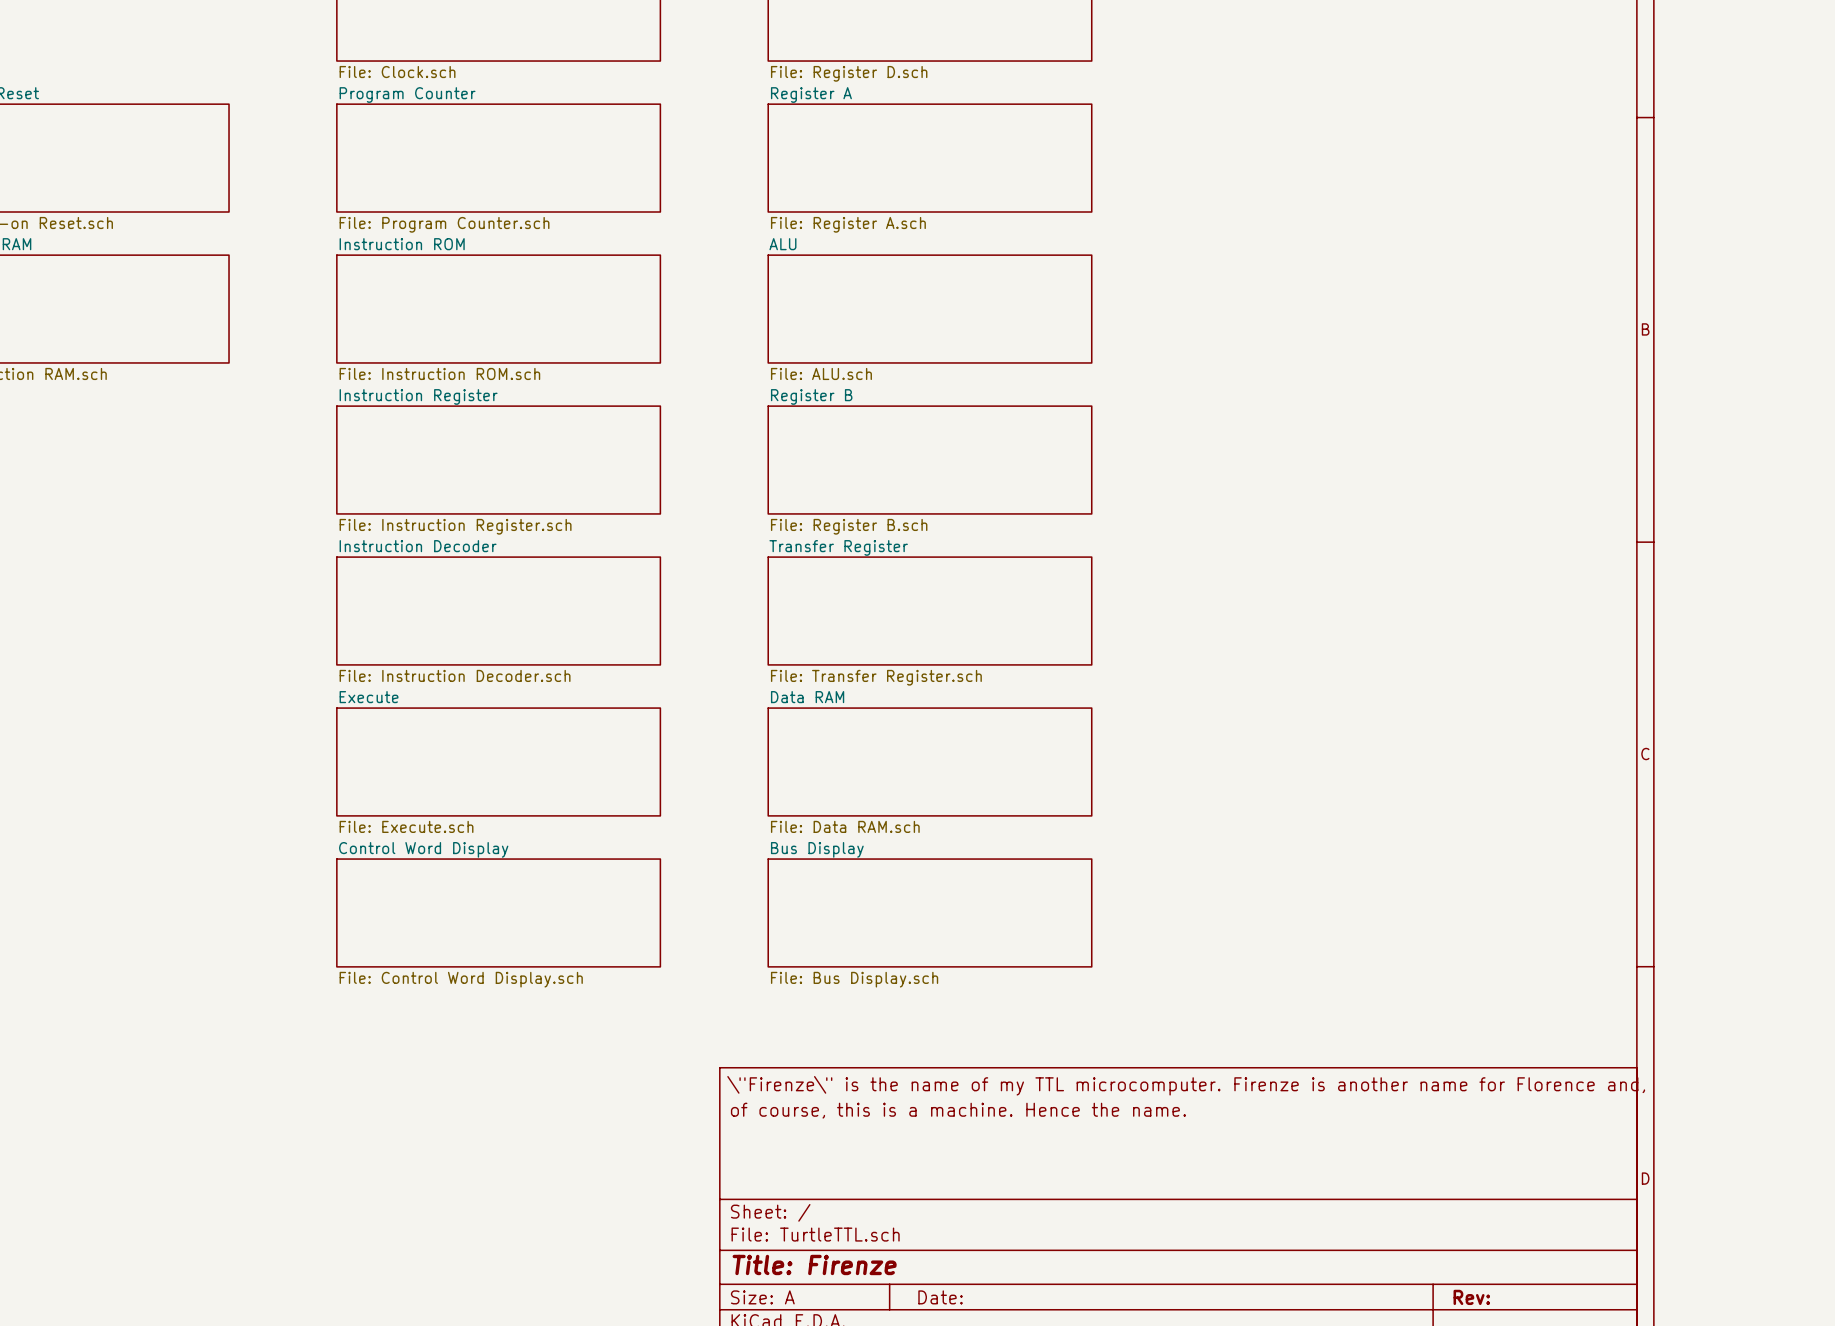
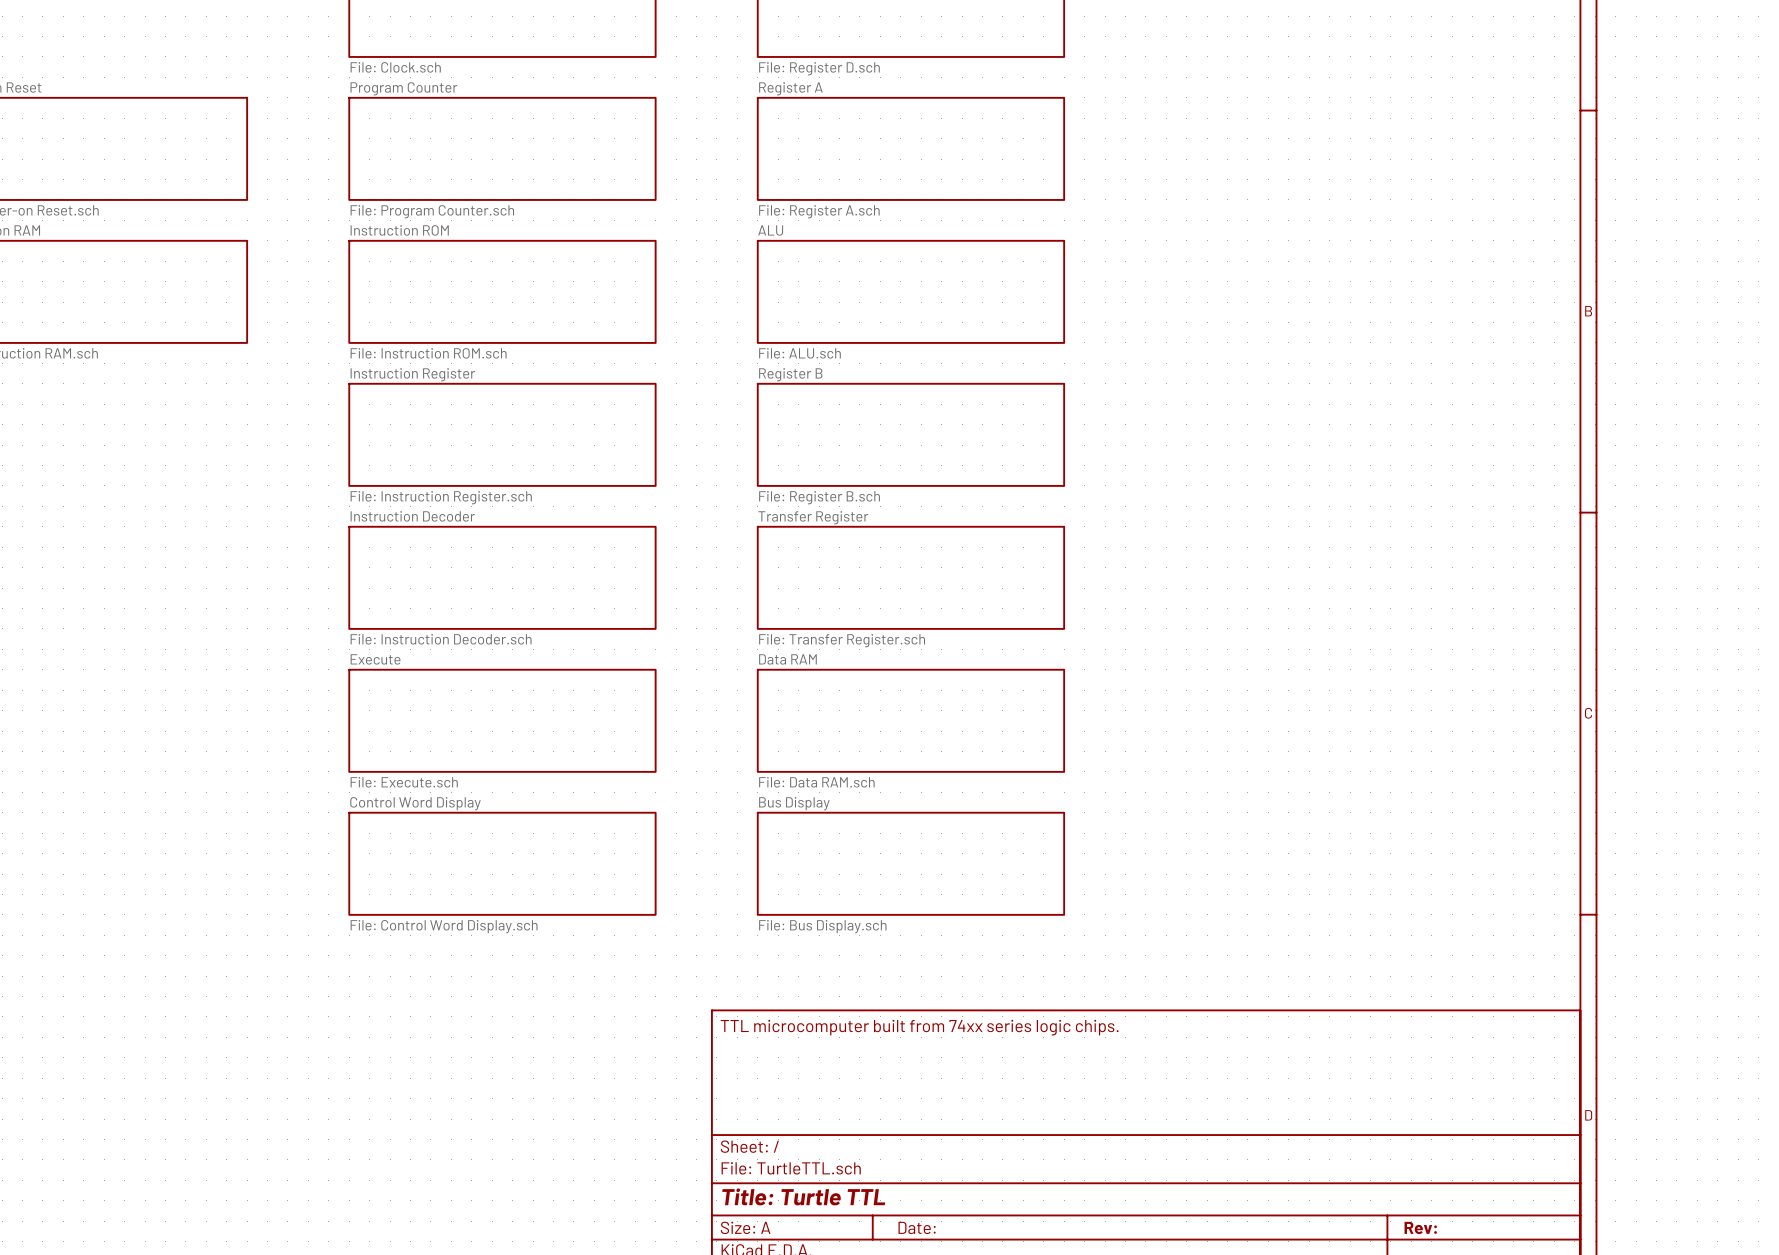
title block: \"Firenze\" is the name of my TTL microcomputer. Firenze is another name for Florence and, (1186, 1085) -> TTL microcomputer built from 74xx series logic chips. (919, 1027)
title block: of course, this is a machine. Hence the name. (958, 1110) -> none
title block: Title: Firenze (814, 1264) -> Title: Turtle TTL (803, 1196)

